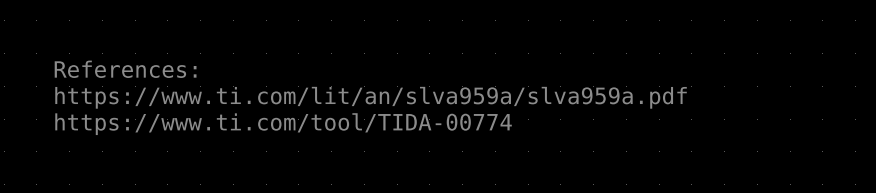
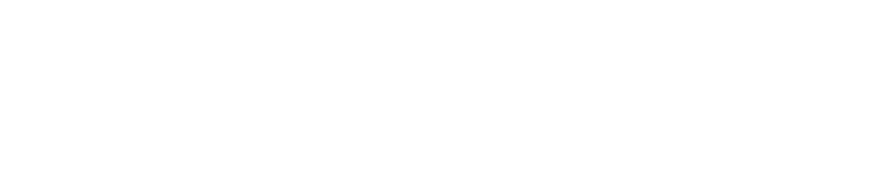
text: References: (125, 69) -> none
text: https://www.ti.com/lit/an/slva959a/slva959a.pdf (371, 97) -> none
text: https://www.ti.com/tool/TIDA-00774 (283, 124) -> none

